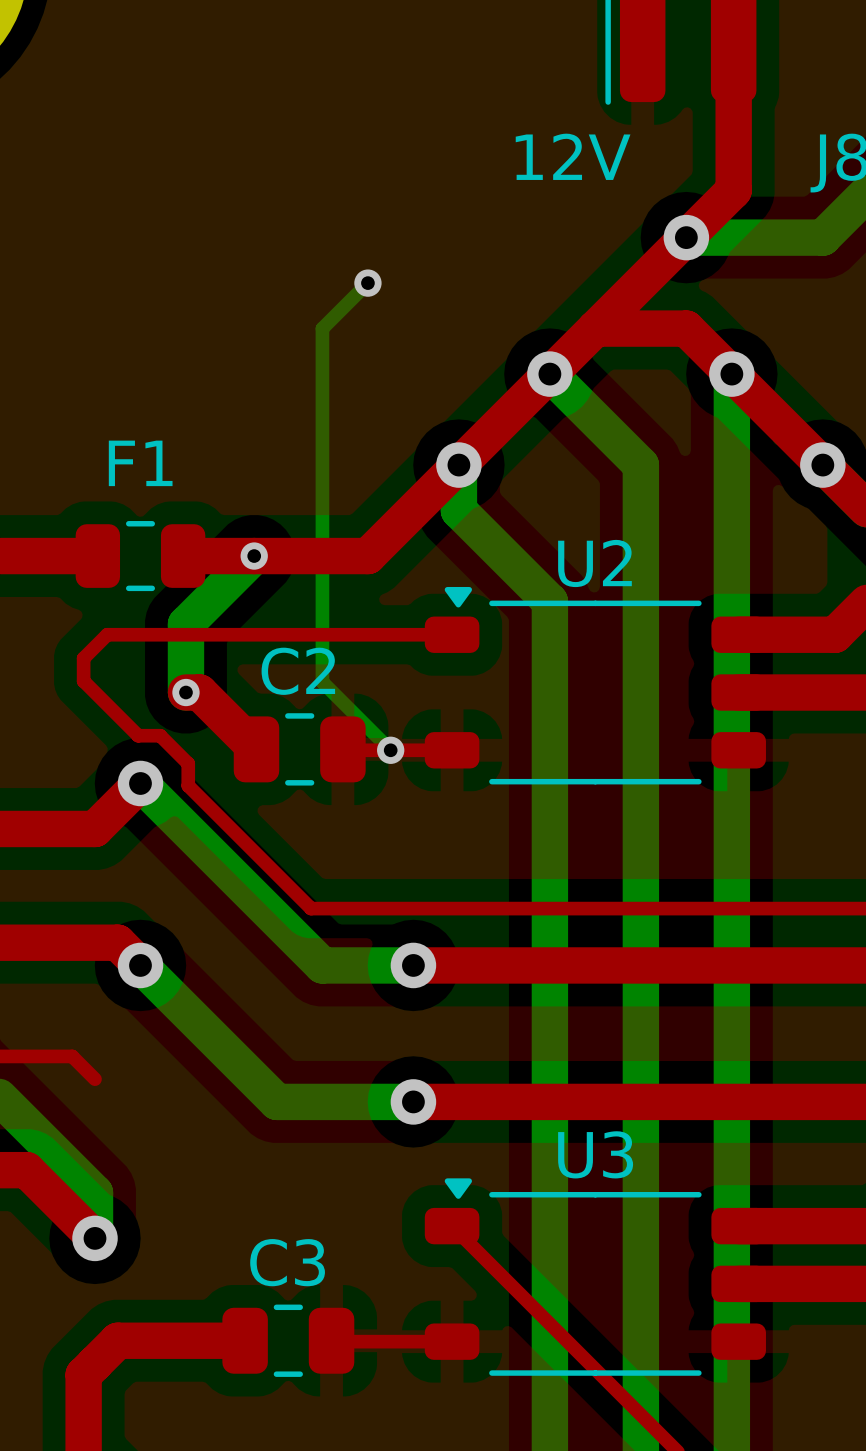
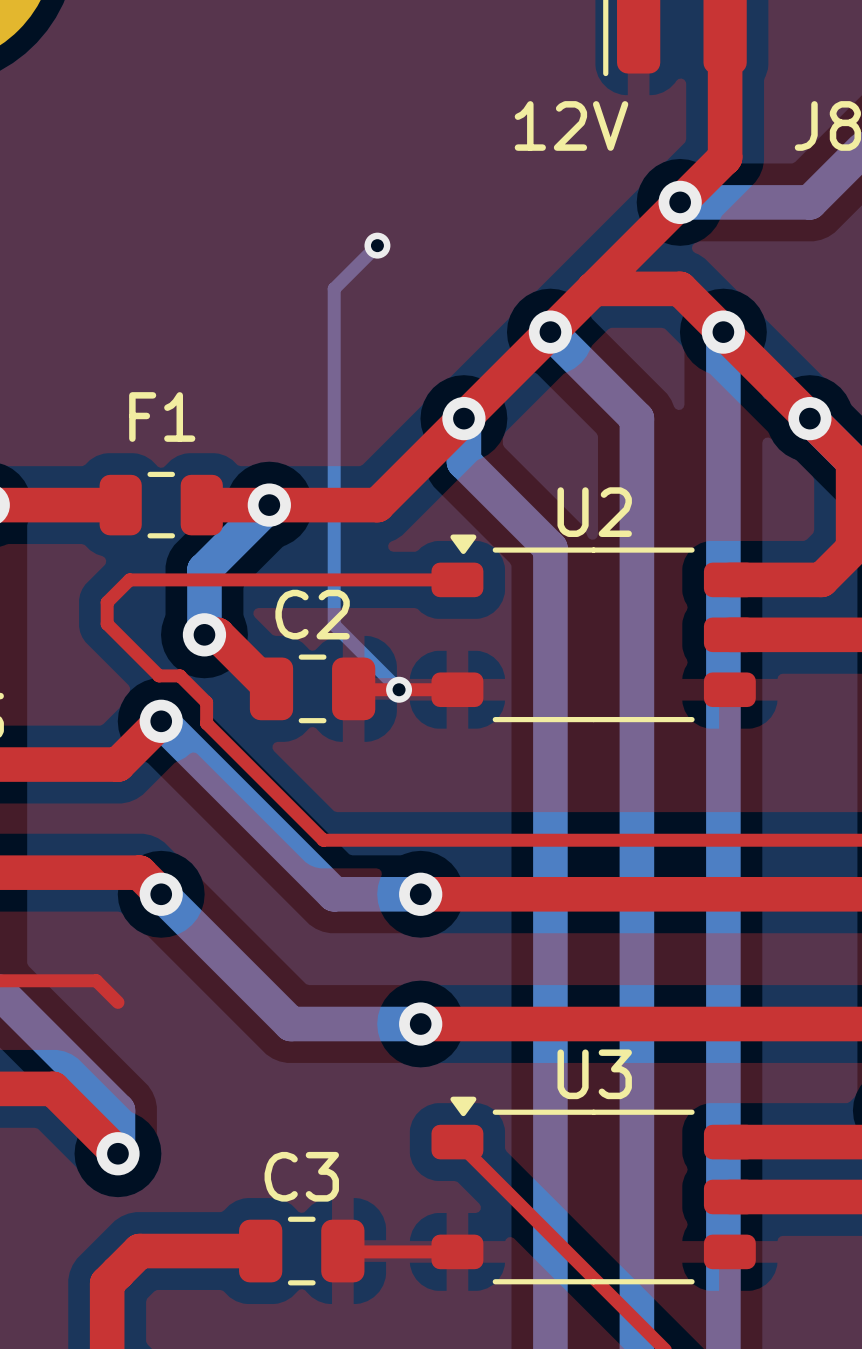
via size: [240, 542, 268, 570] -> [247, 483, 291, 527]
via size: [172, 678, 200, 707] -> [182, 613, 227, 657]

